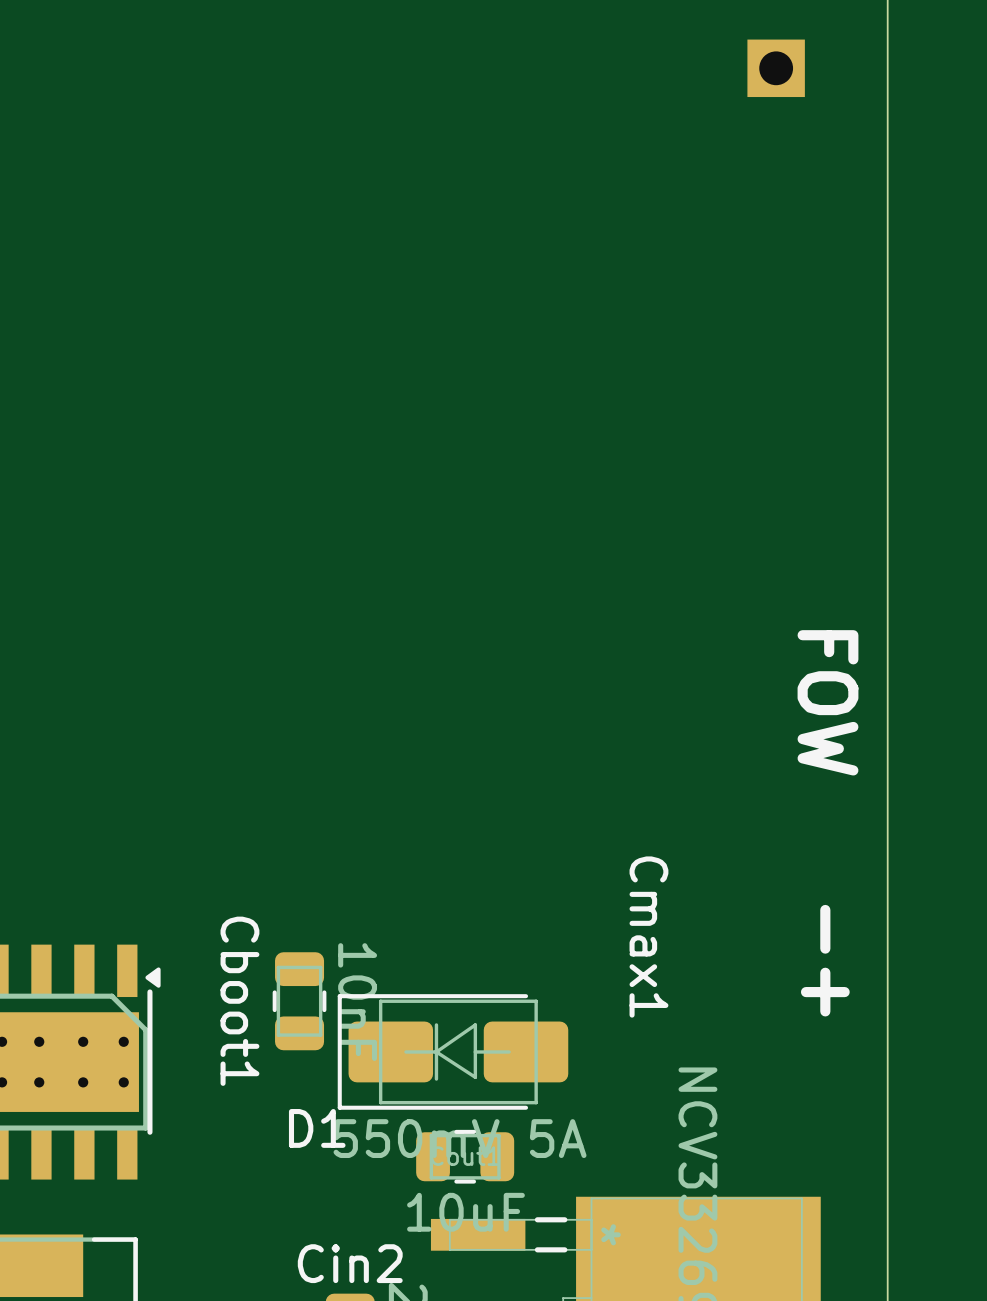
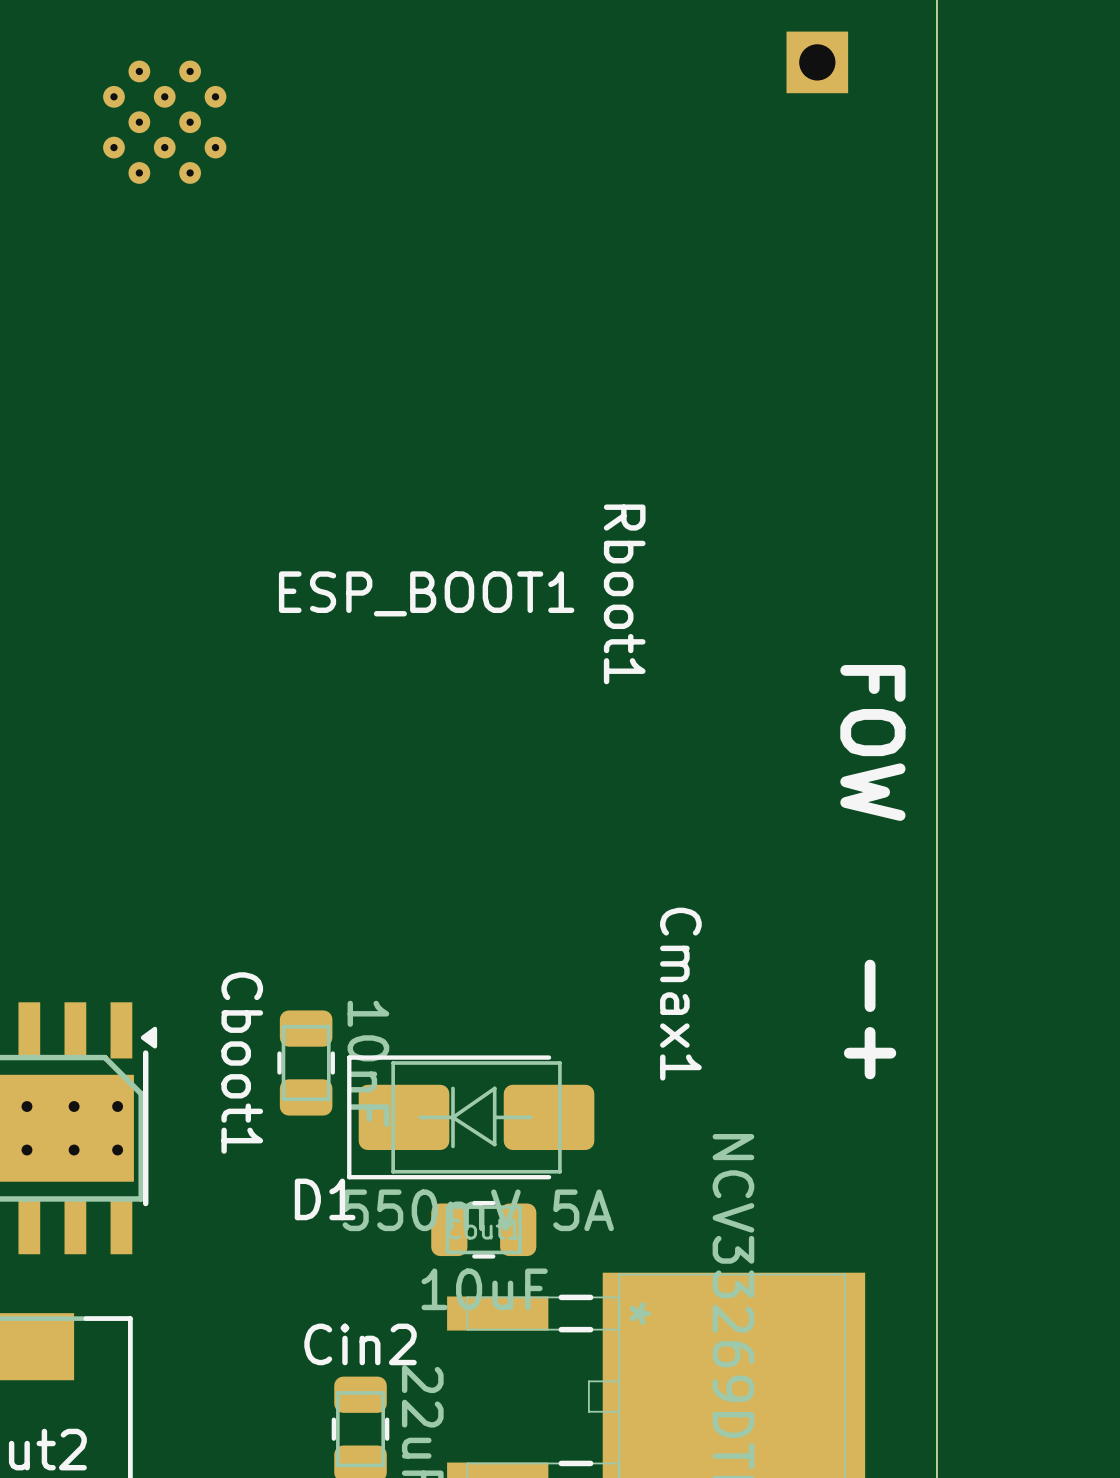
part: none -> (164, 122)
ESP_BOOT1: none -> (426, 593)
Rboot1: none -> (624, 594)

